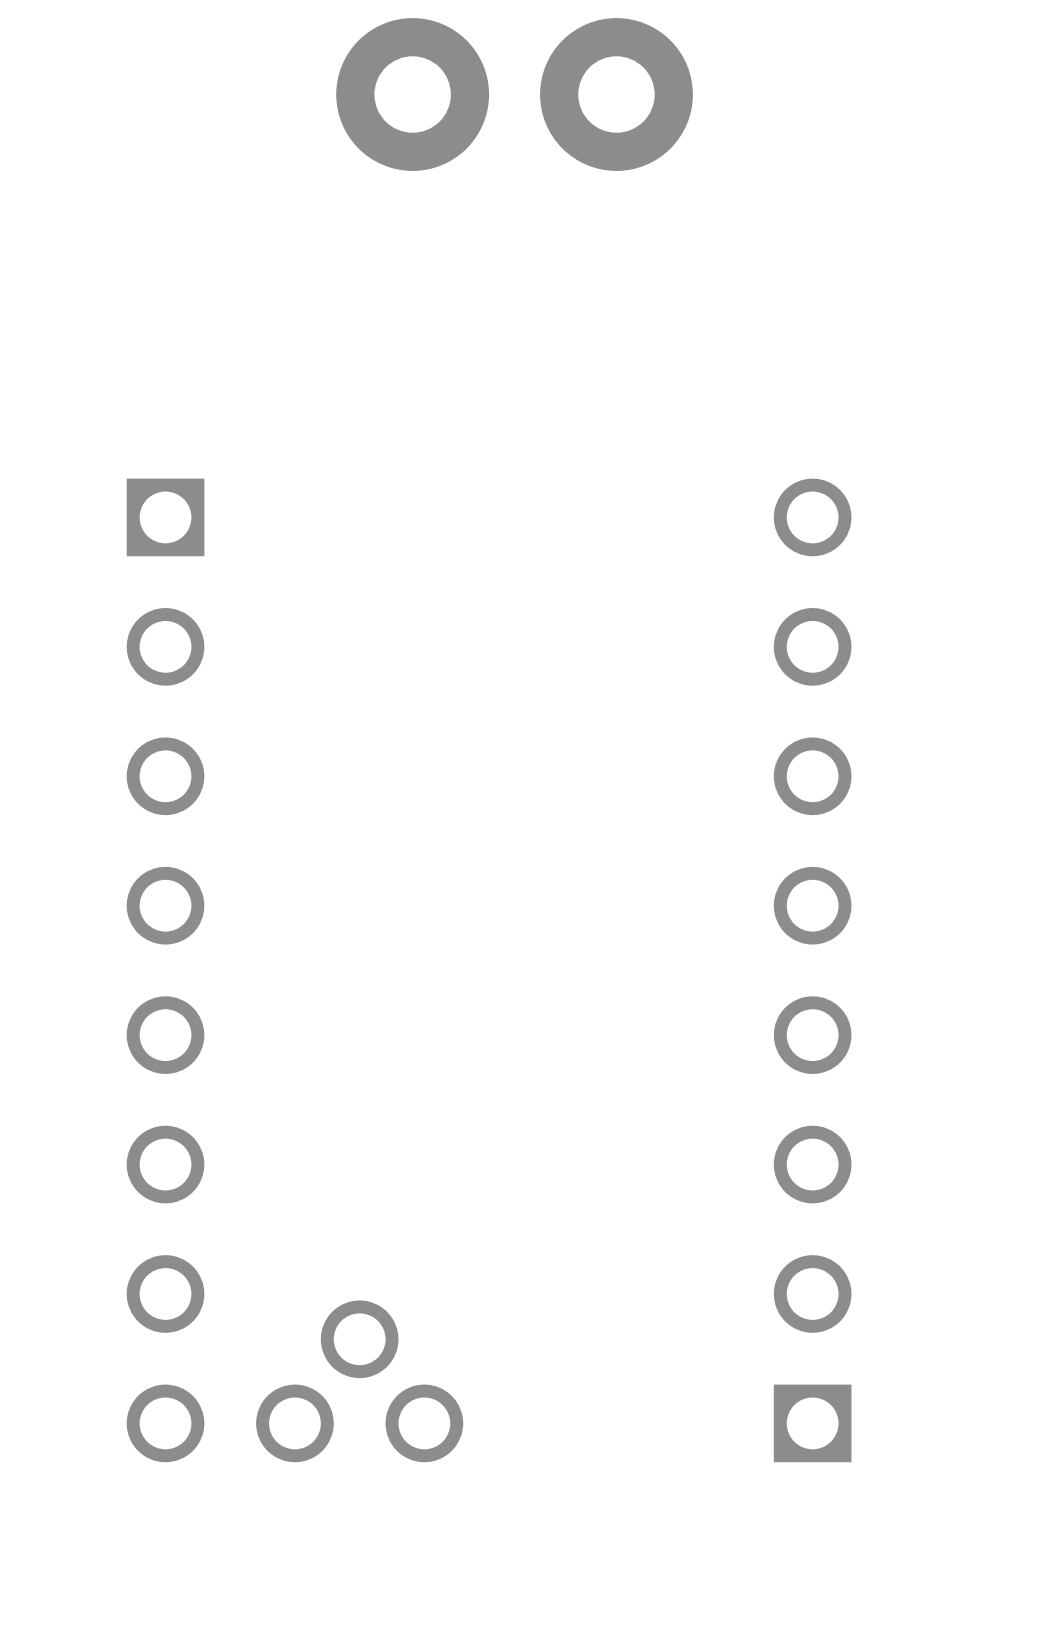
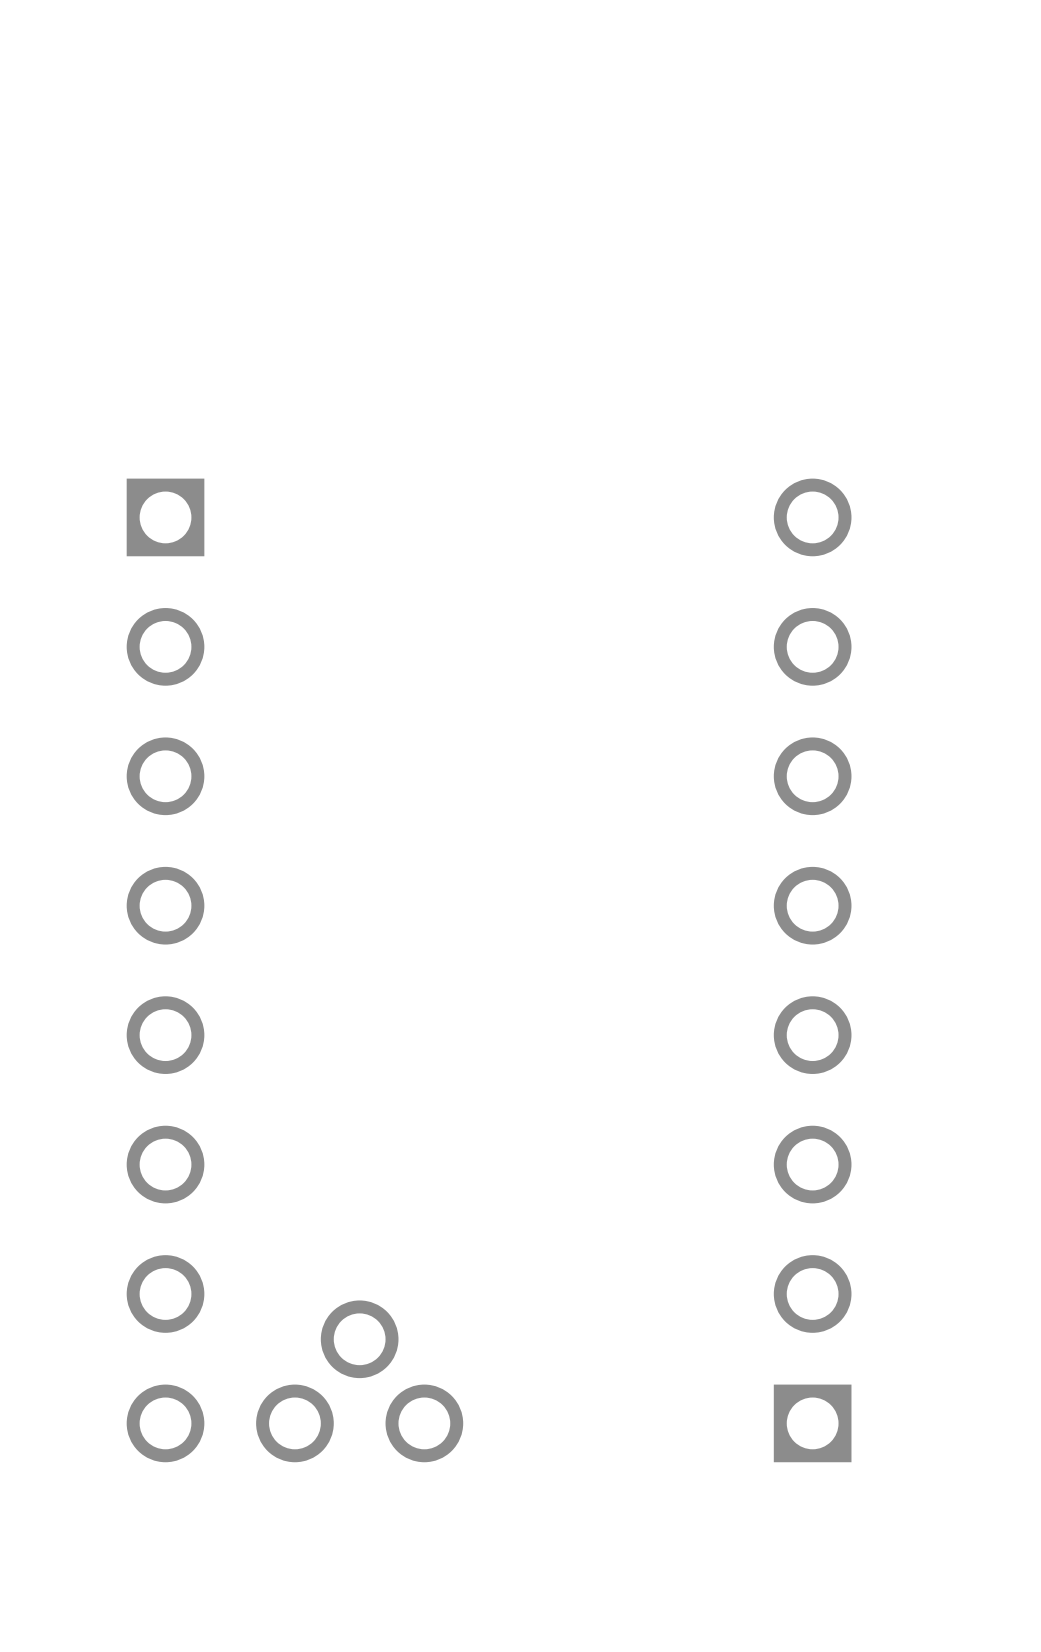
part: (514, 94) -> none

